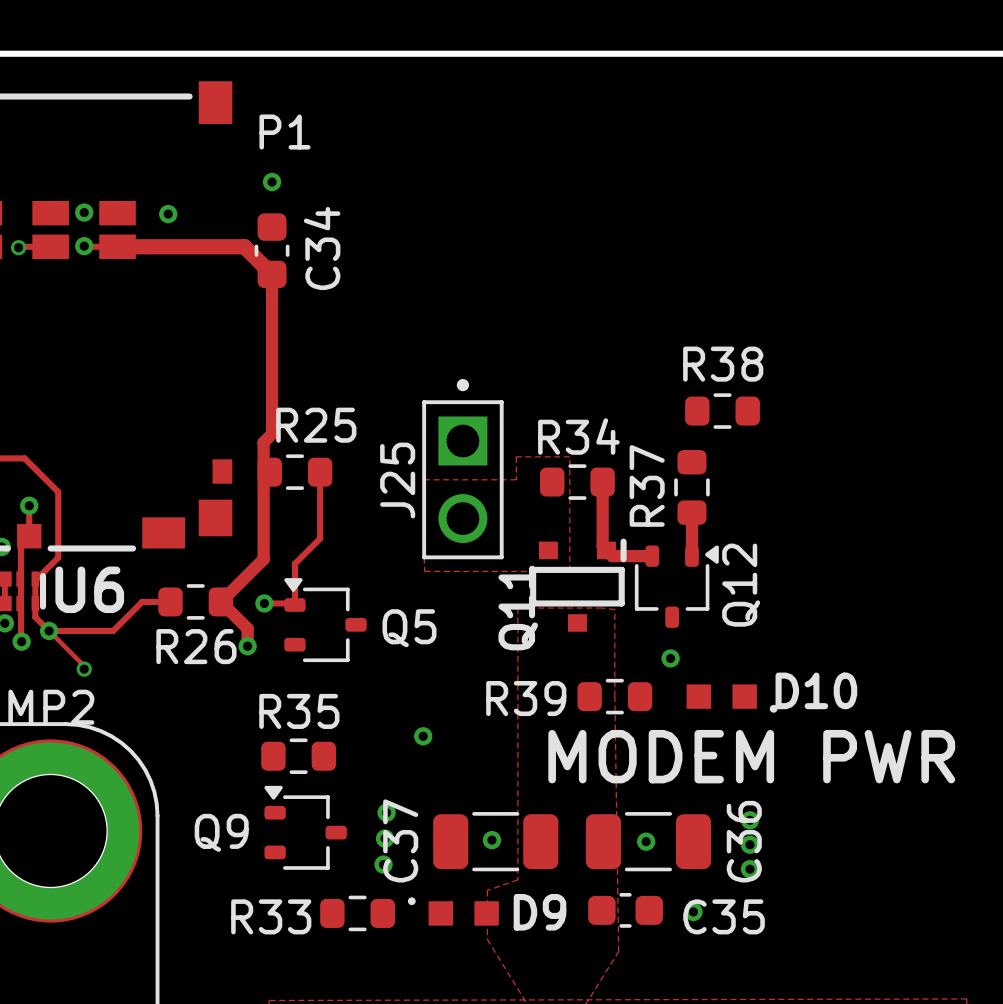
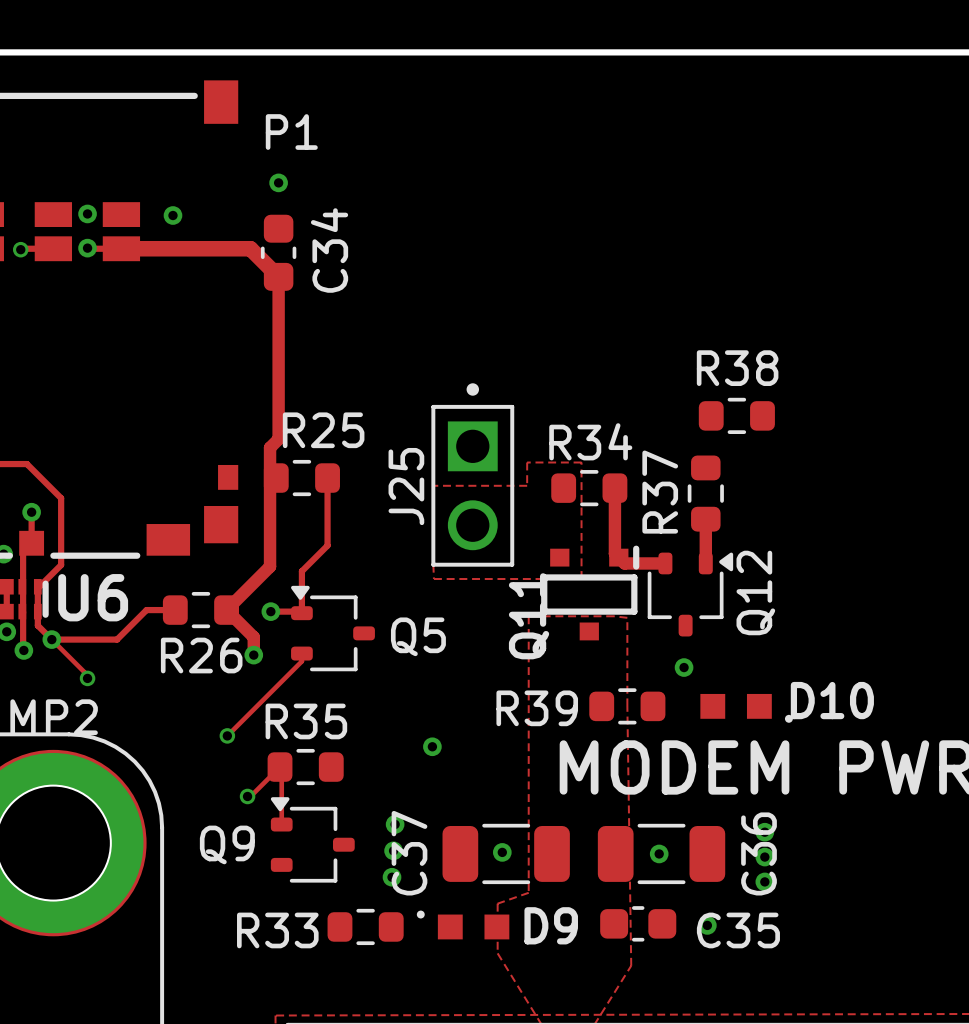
track: none -> (301, 653) (301, 661) (227, 735)
via: none -> (227, 735)
track: none -> (247, 796) (250, 796) (280, 767) (281, 768) (281, 824)
via: none -> (247, 796)

